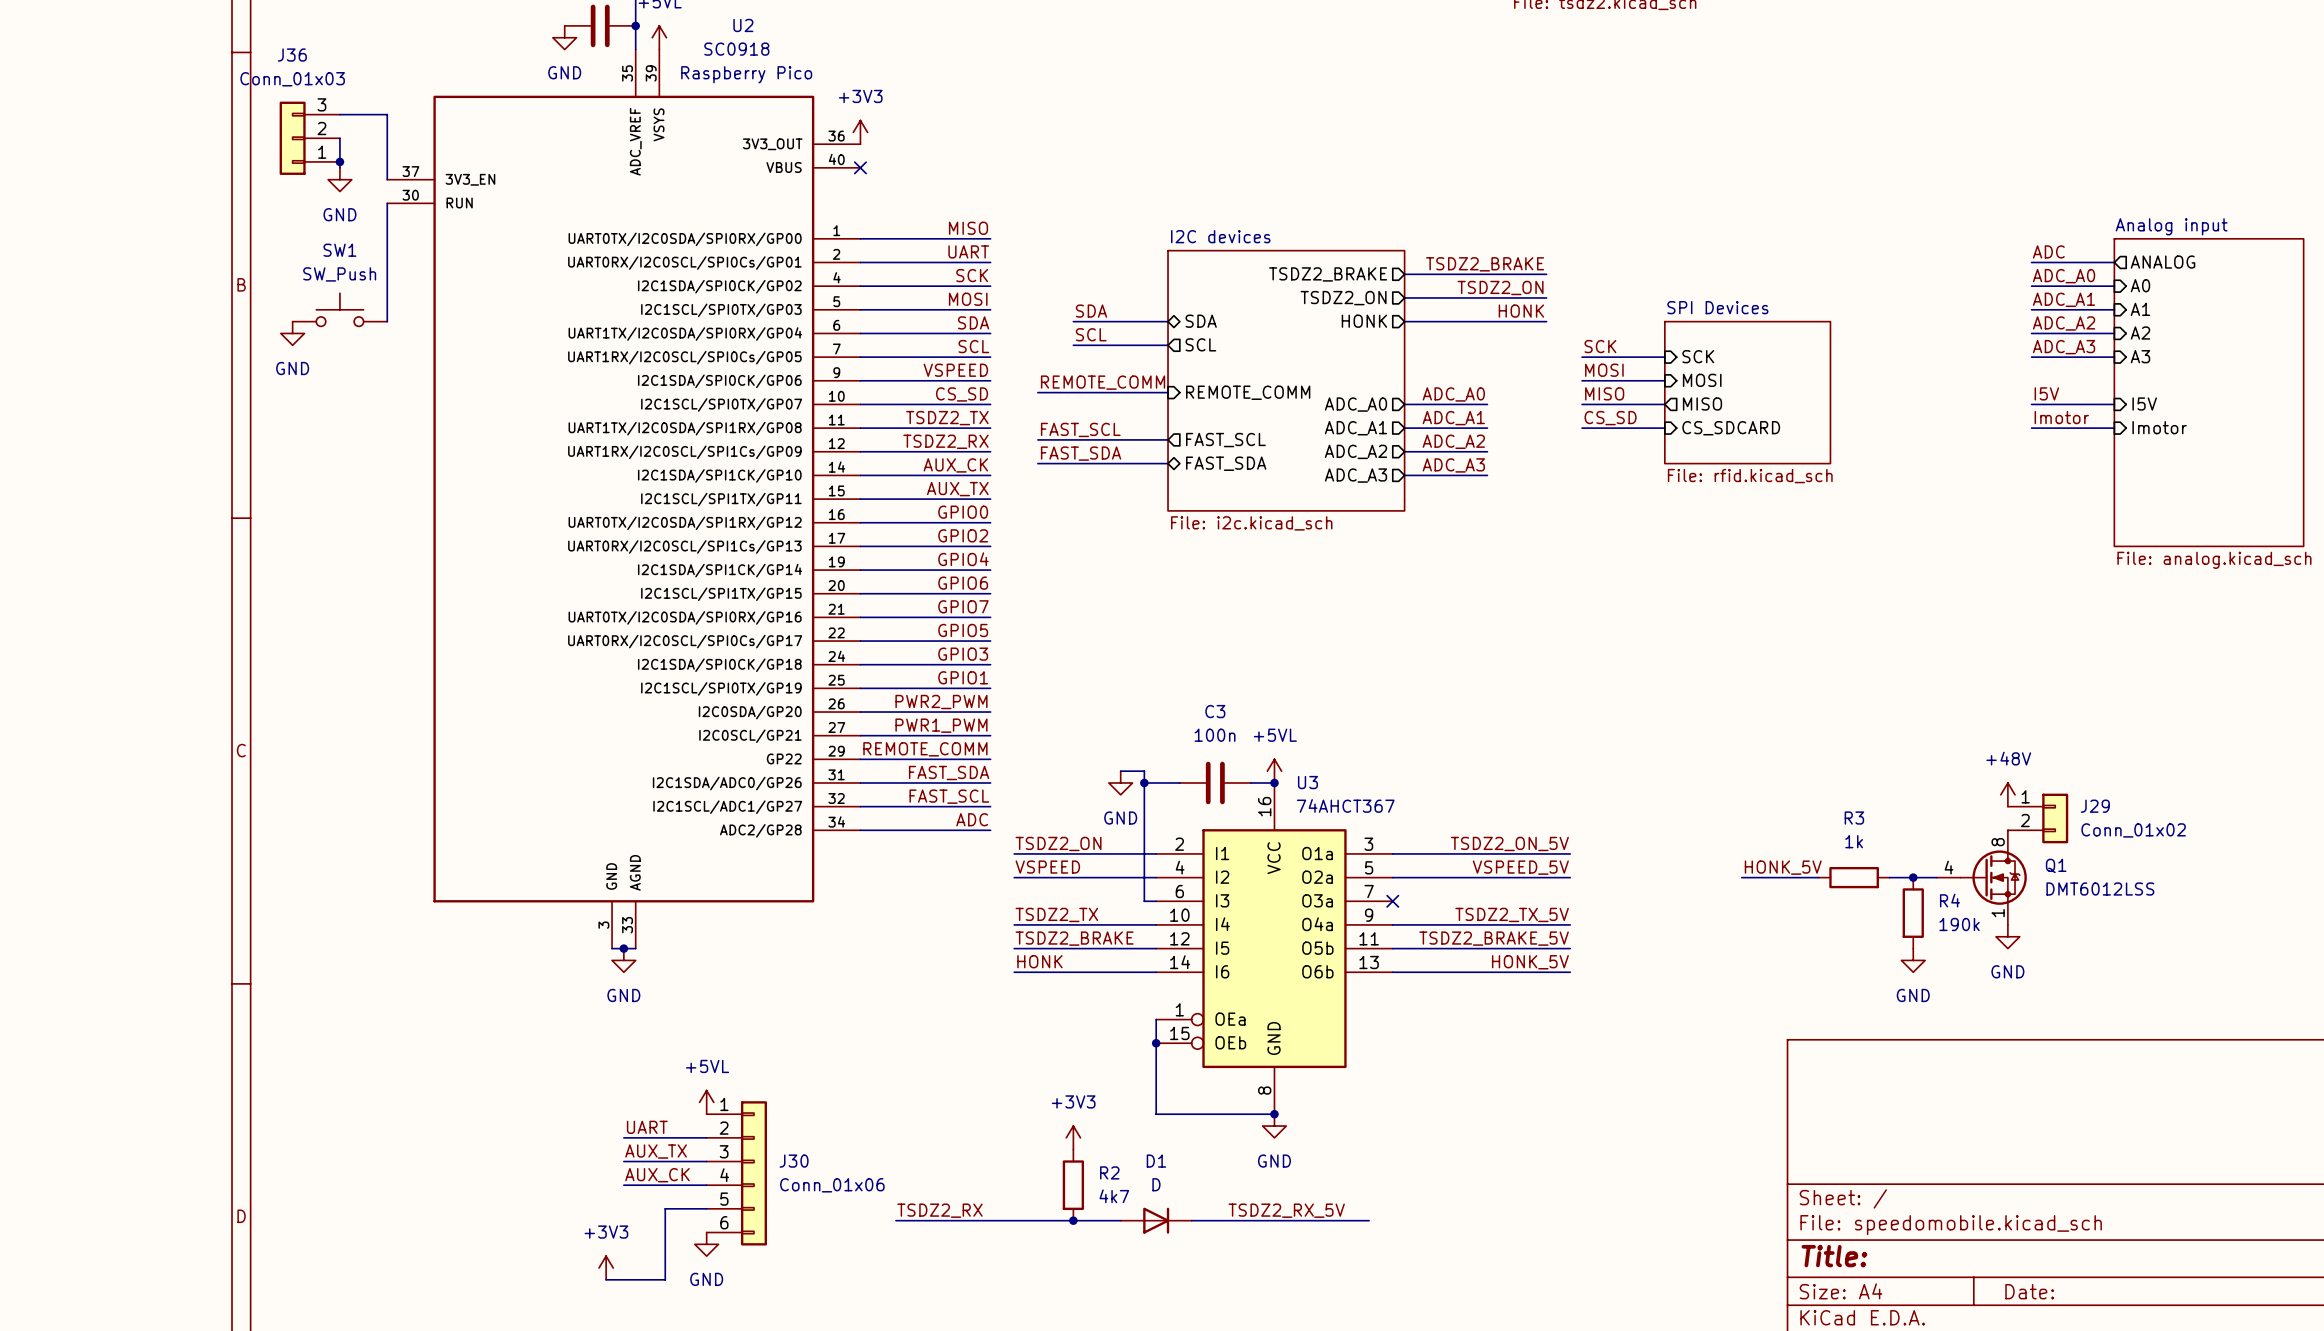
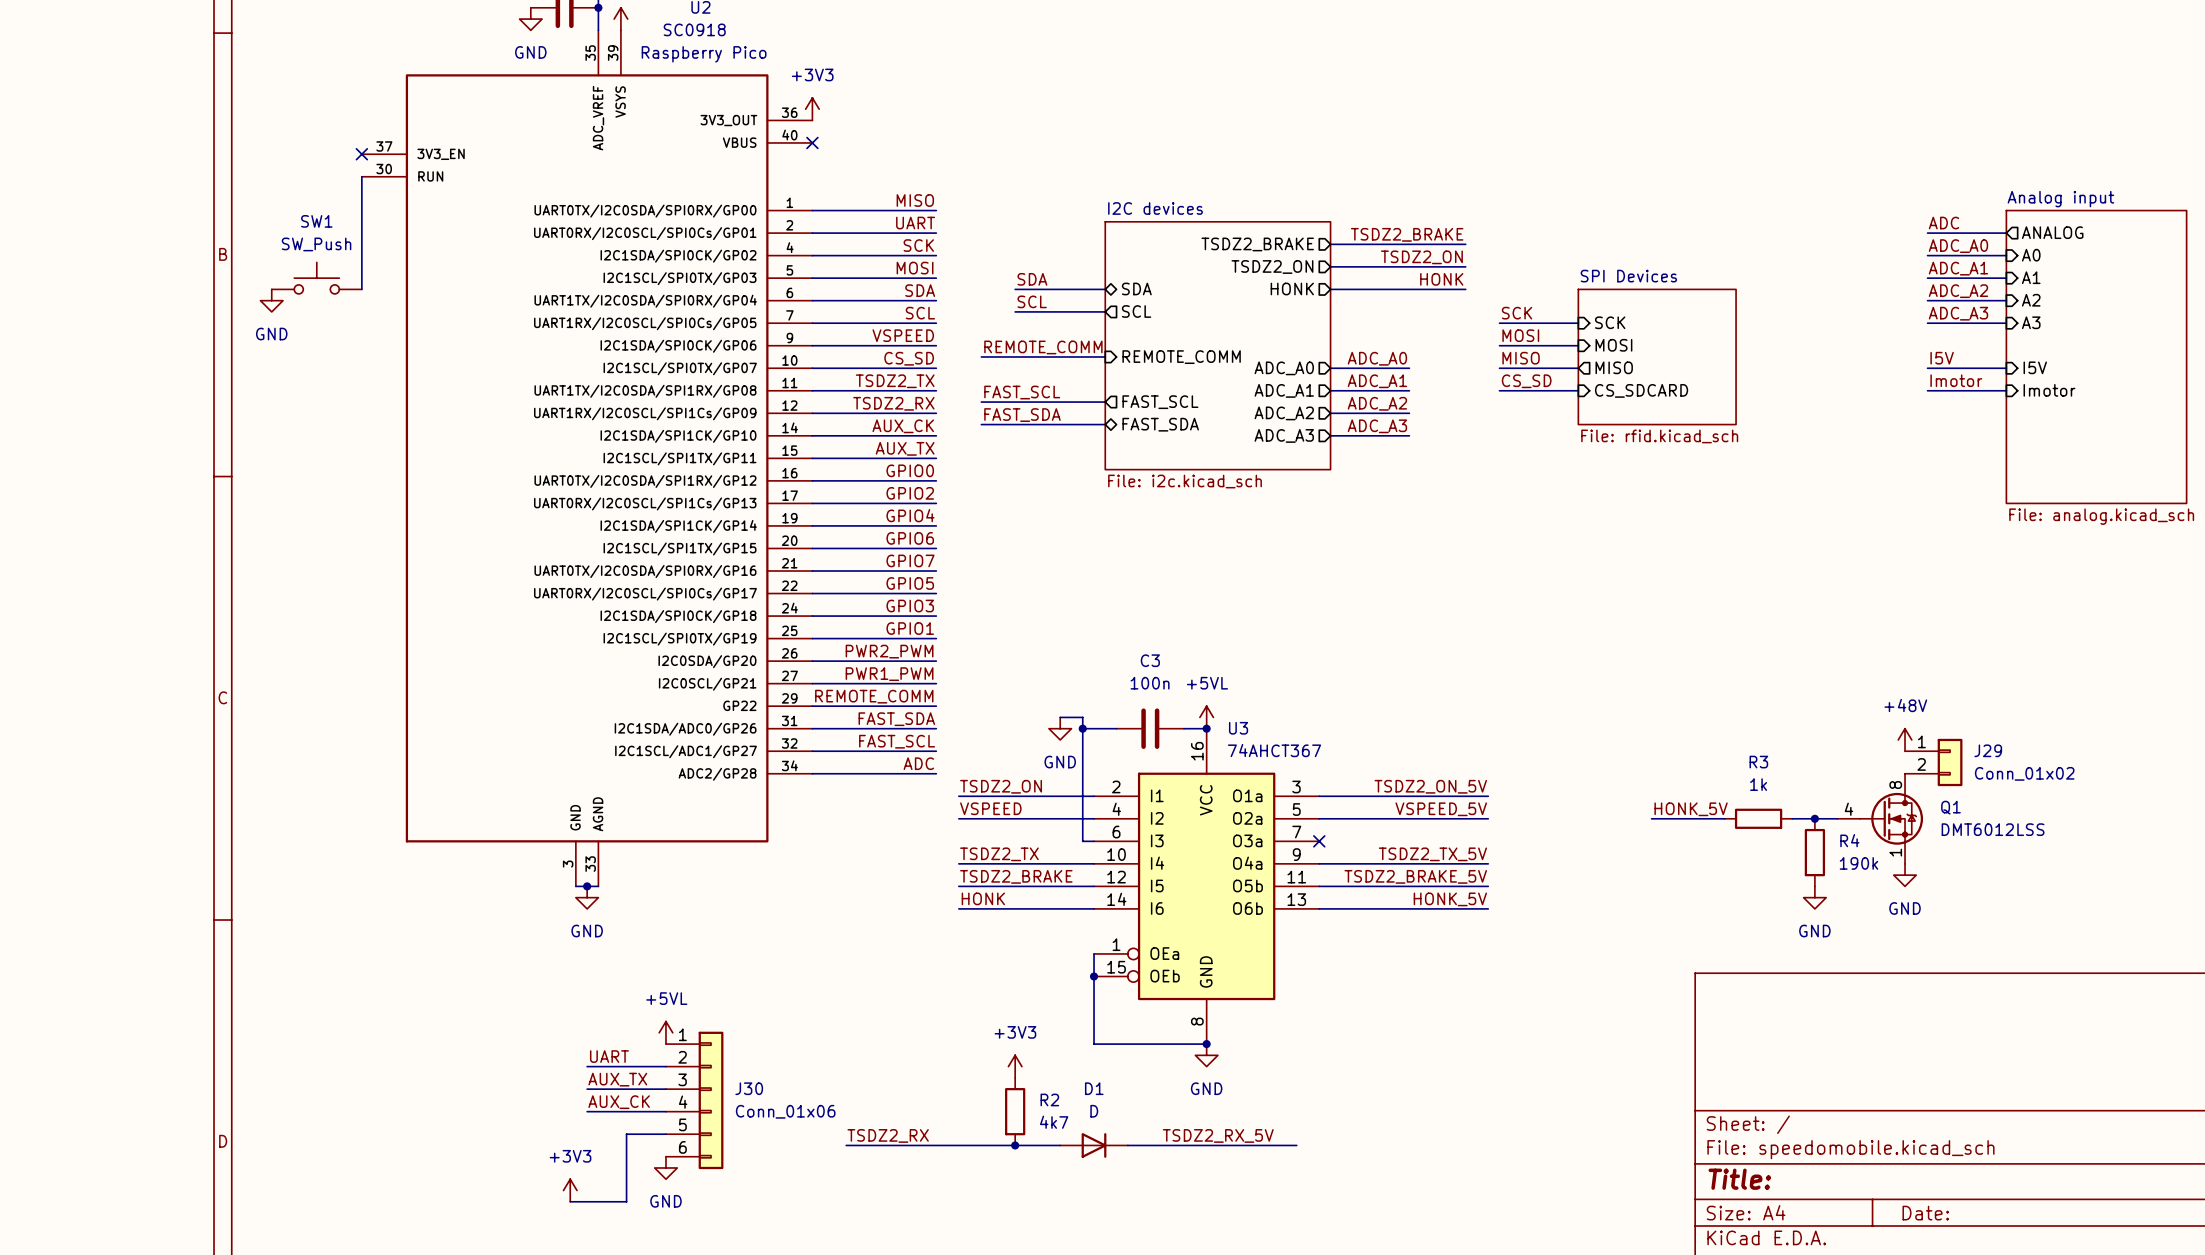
wire: (339, 114) (387, 114) (387, 179) -> none
J36: Conn_01x03 (309, 138) -> none
wire: (339, 138) (339, 167) -> none
junction: (339, 161) -> none
power symbol: GND (339, 179) -> none
no-connect mark: none -> (361, 154)

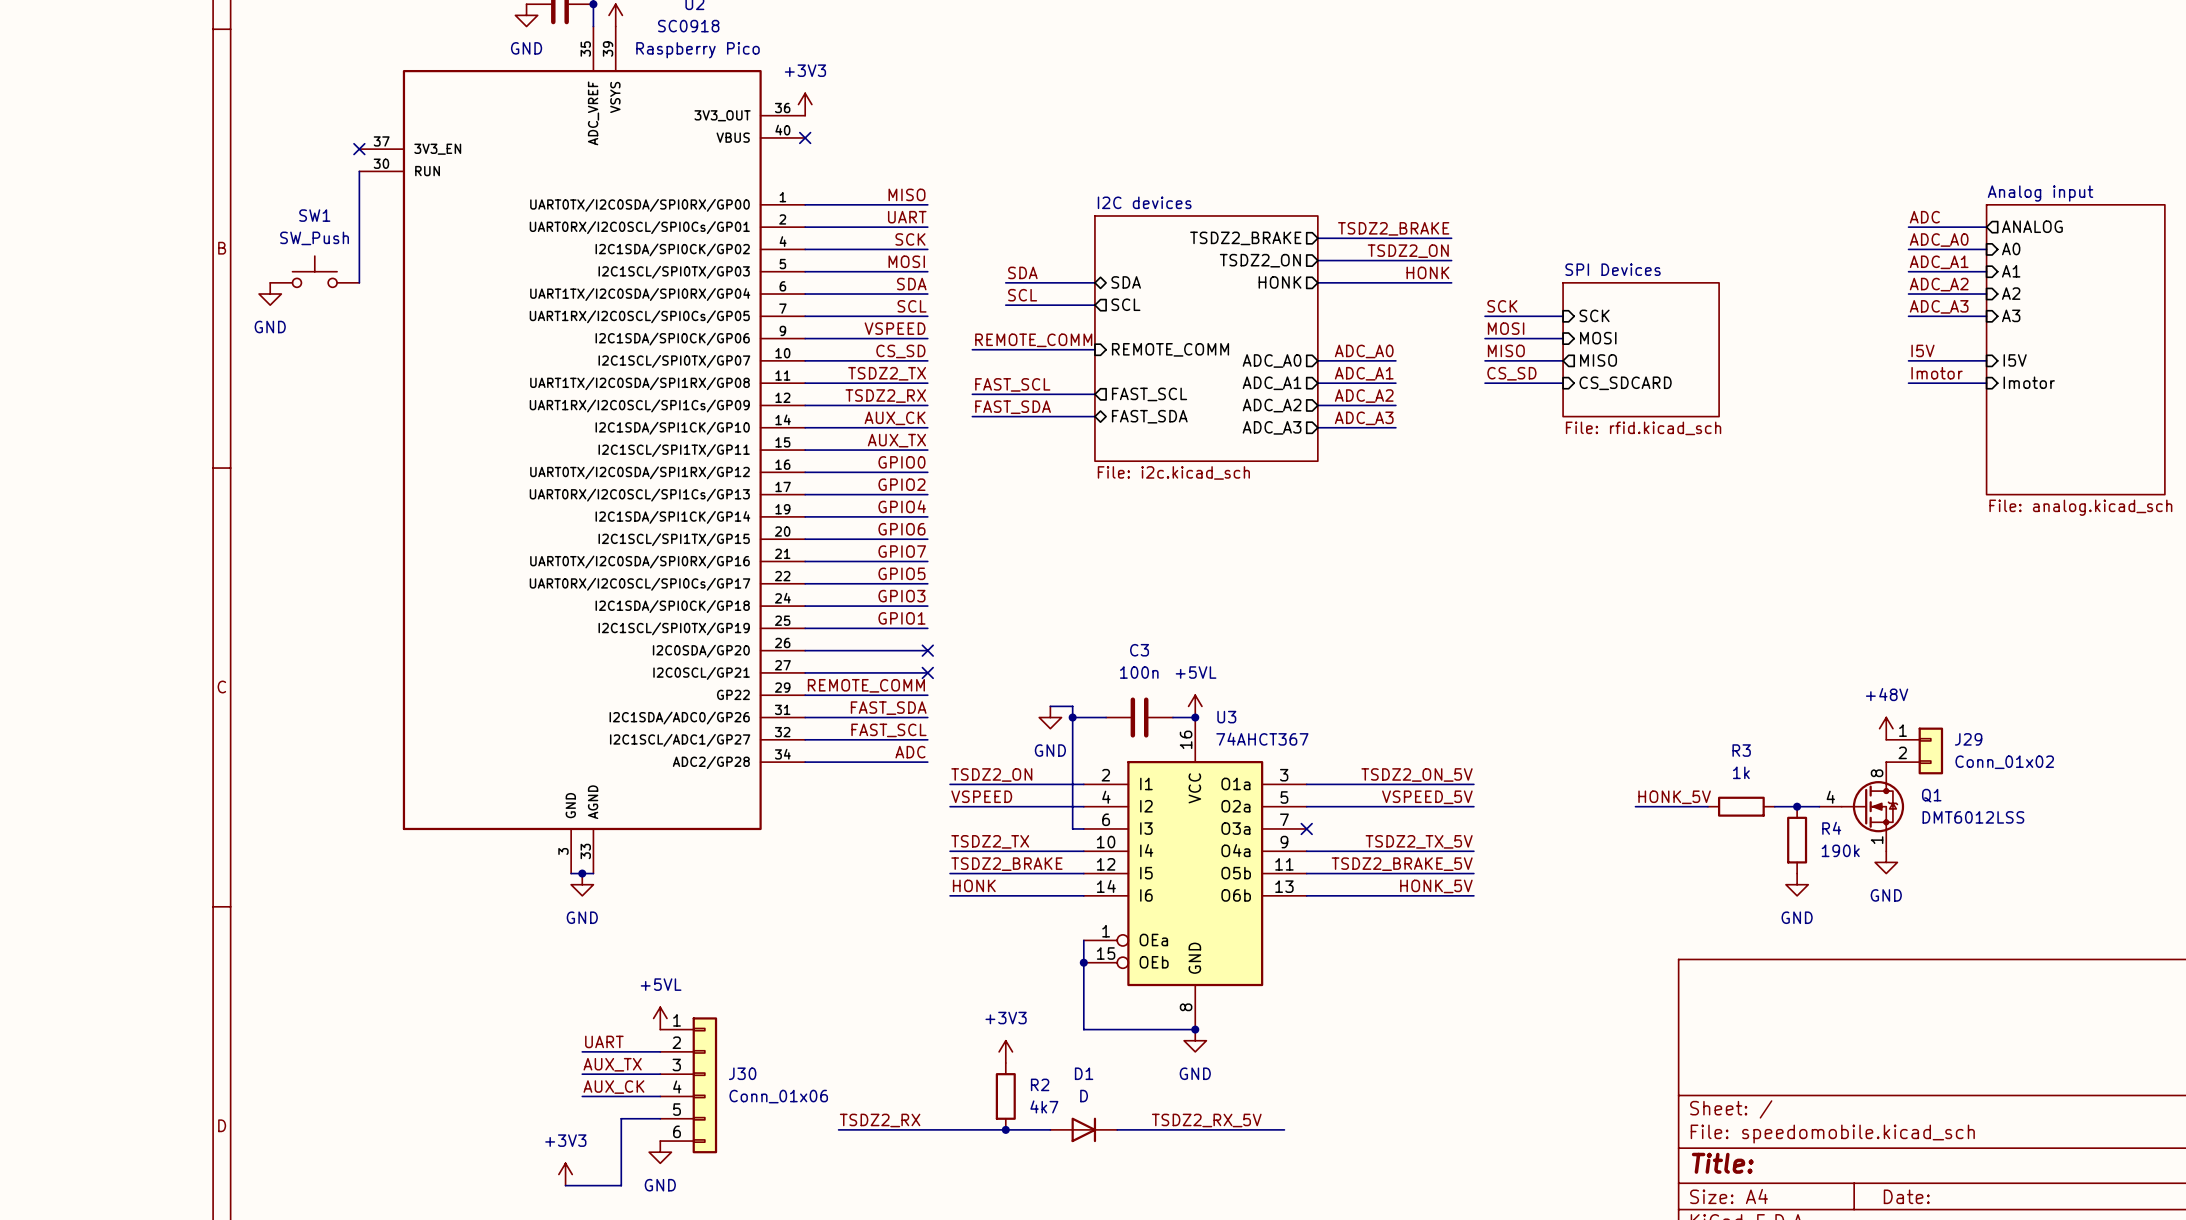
label: PWR2_PWM (889, 651) -> none
no-connect mark: none -> (927, 650)
label: PWR1_PWM (889, 674) -> none
no-connect mark: none -> (927, 672)

